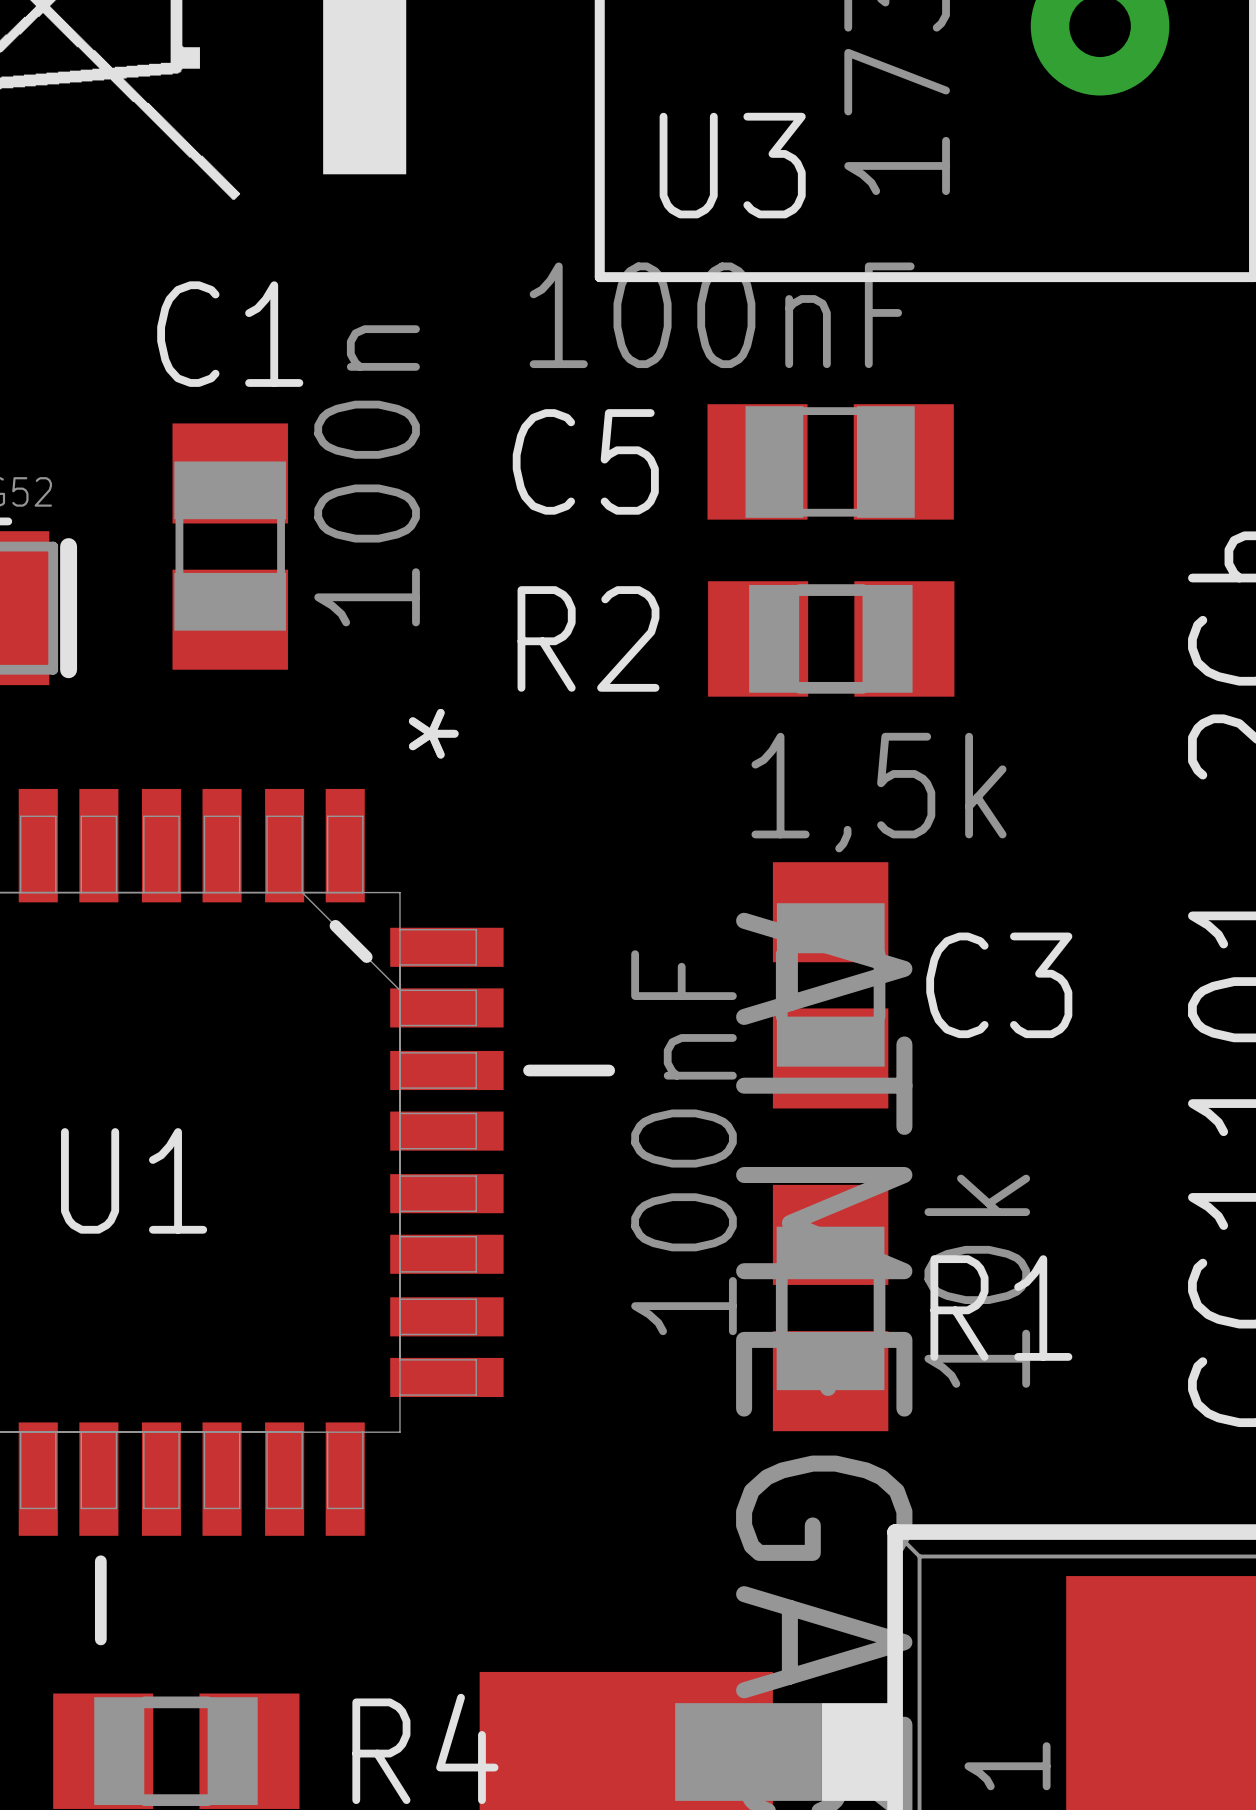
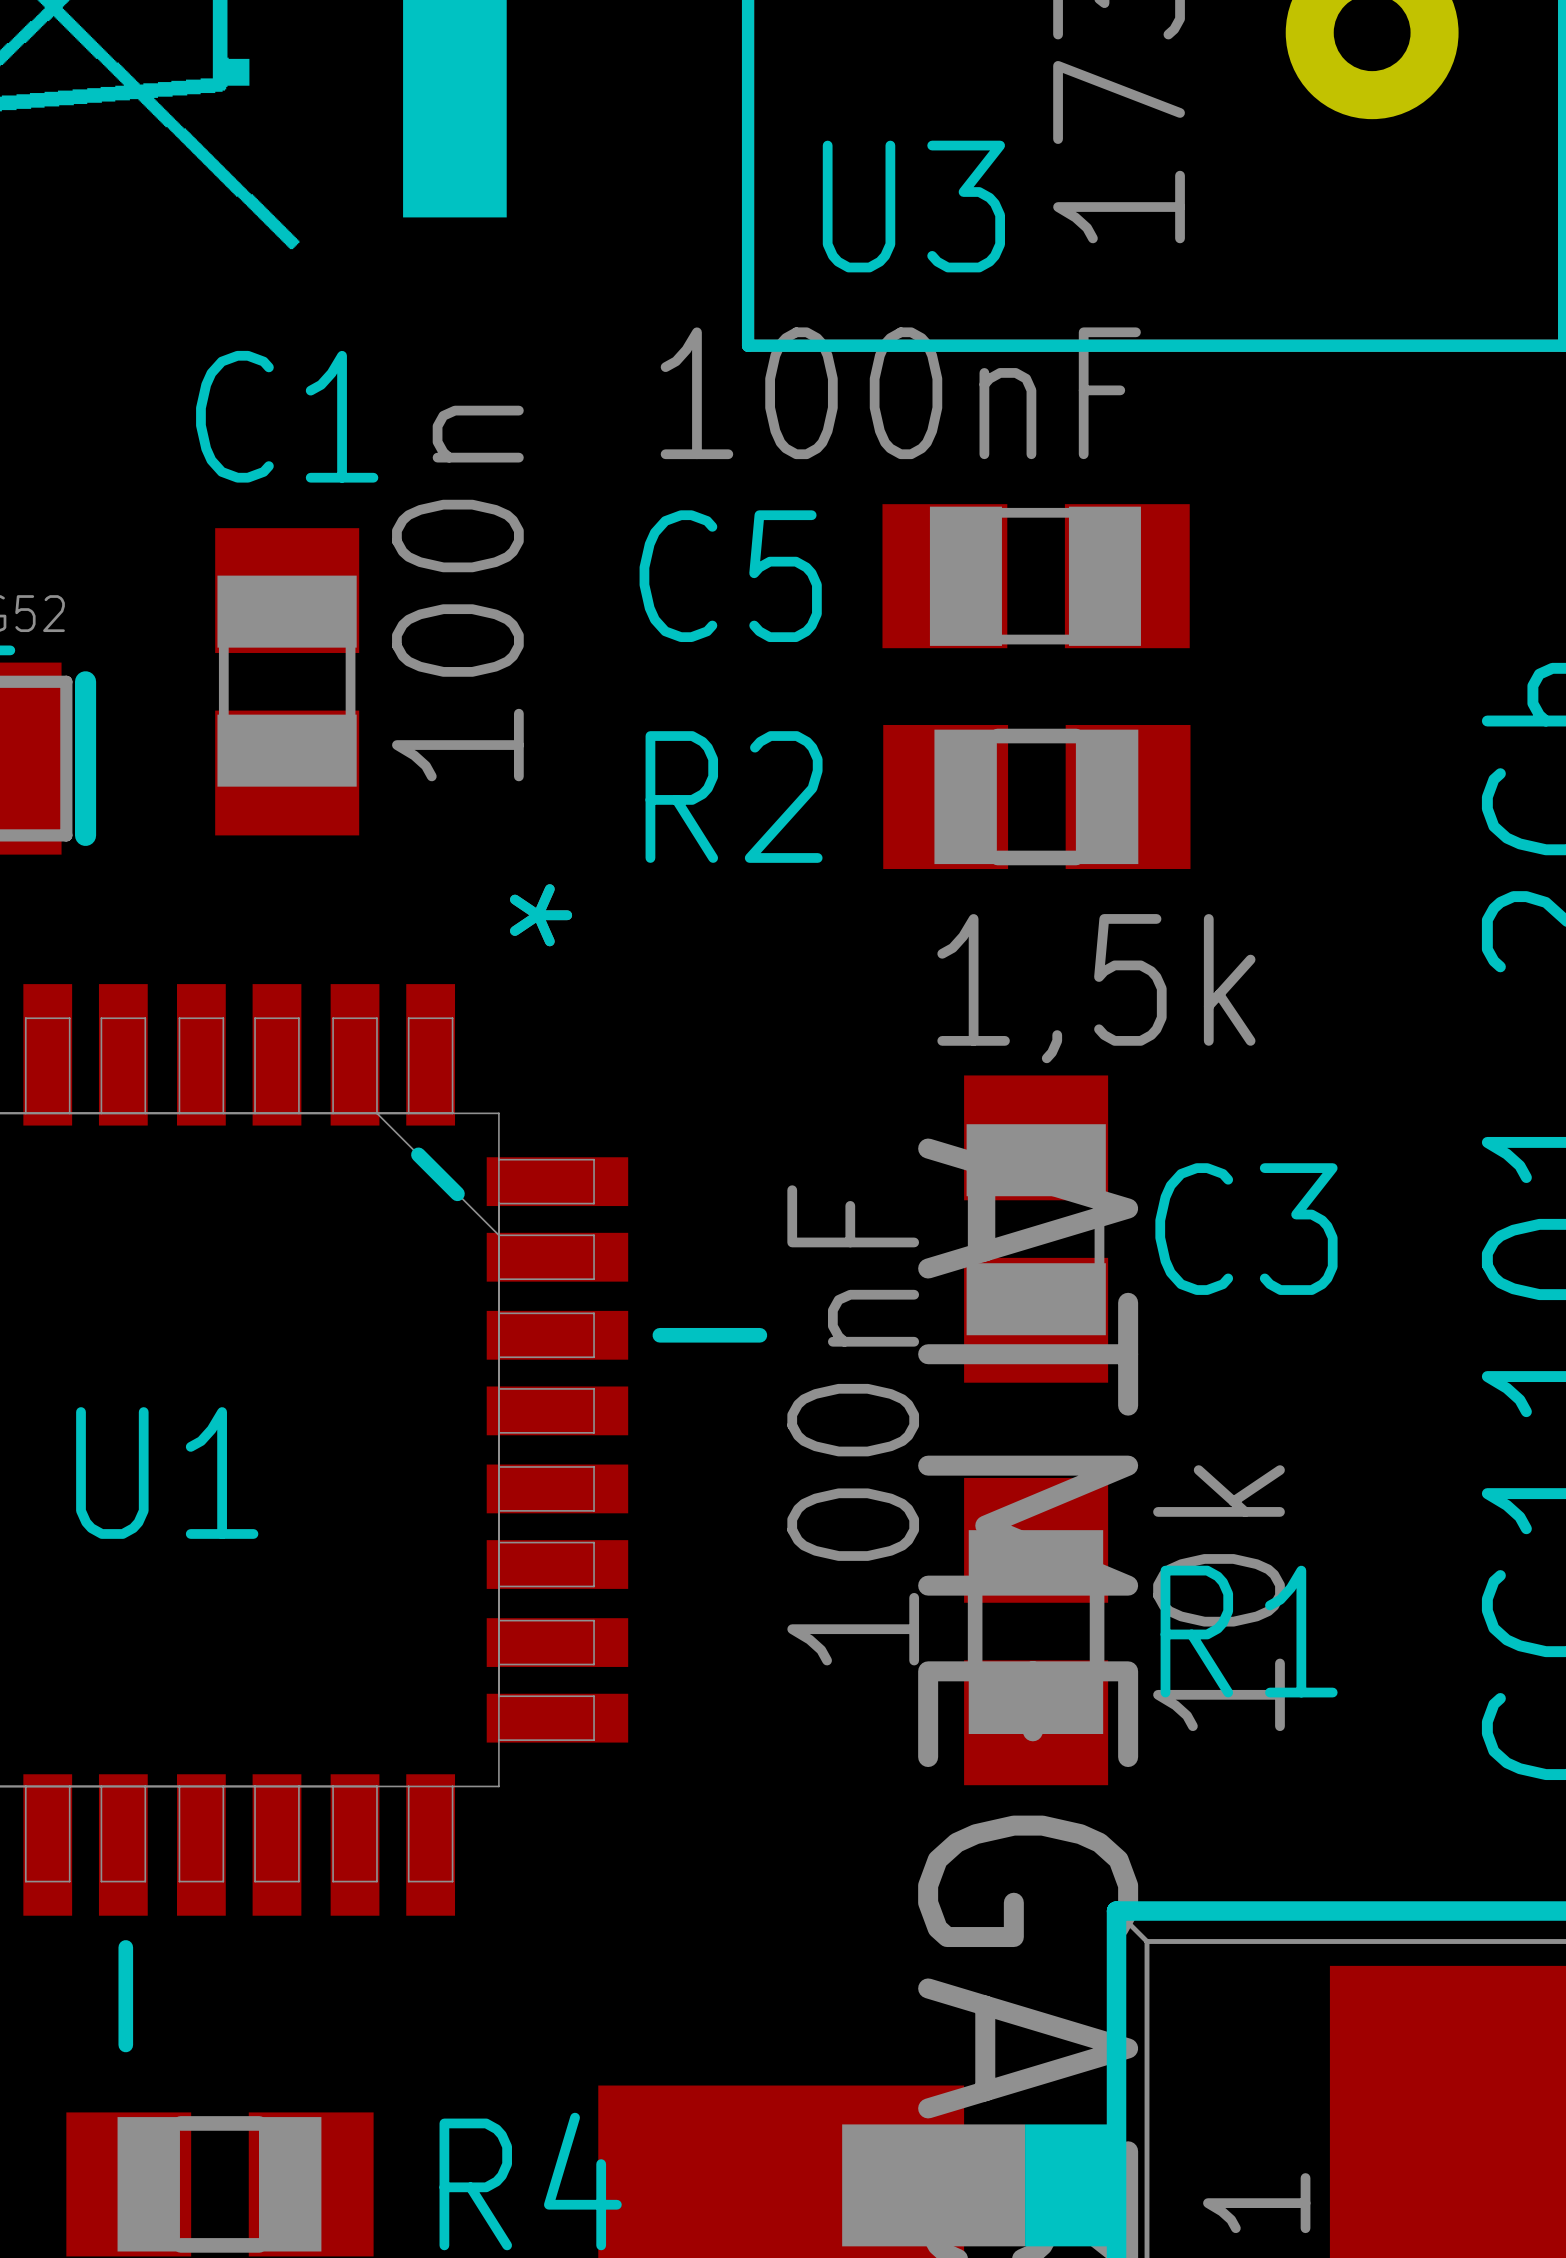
C3 footprint: [772, 862, 889, 1109] -> [964, 1075, 1109, 1383]

